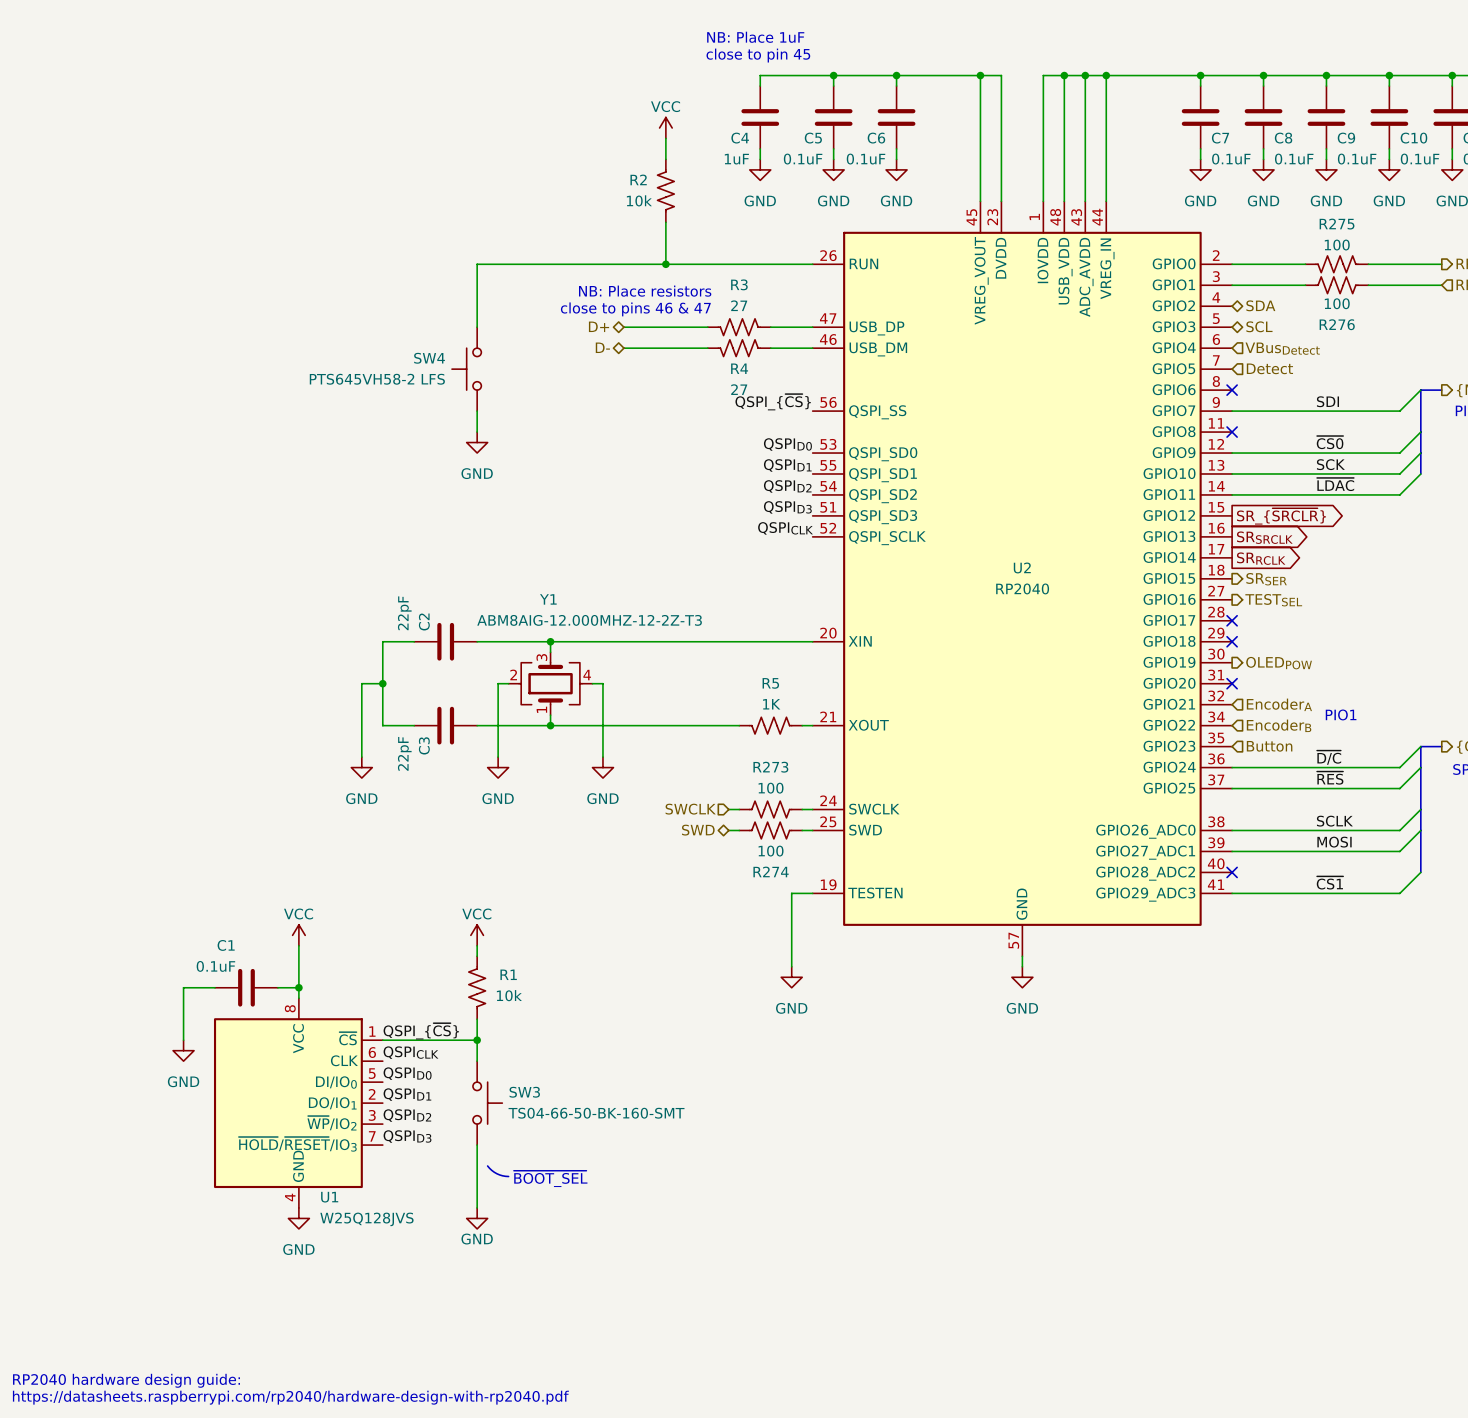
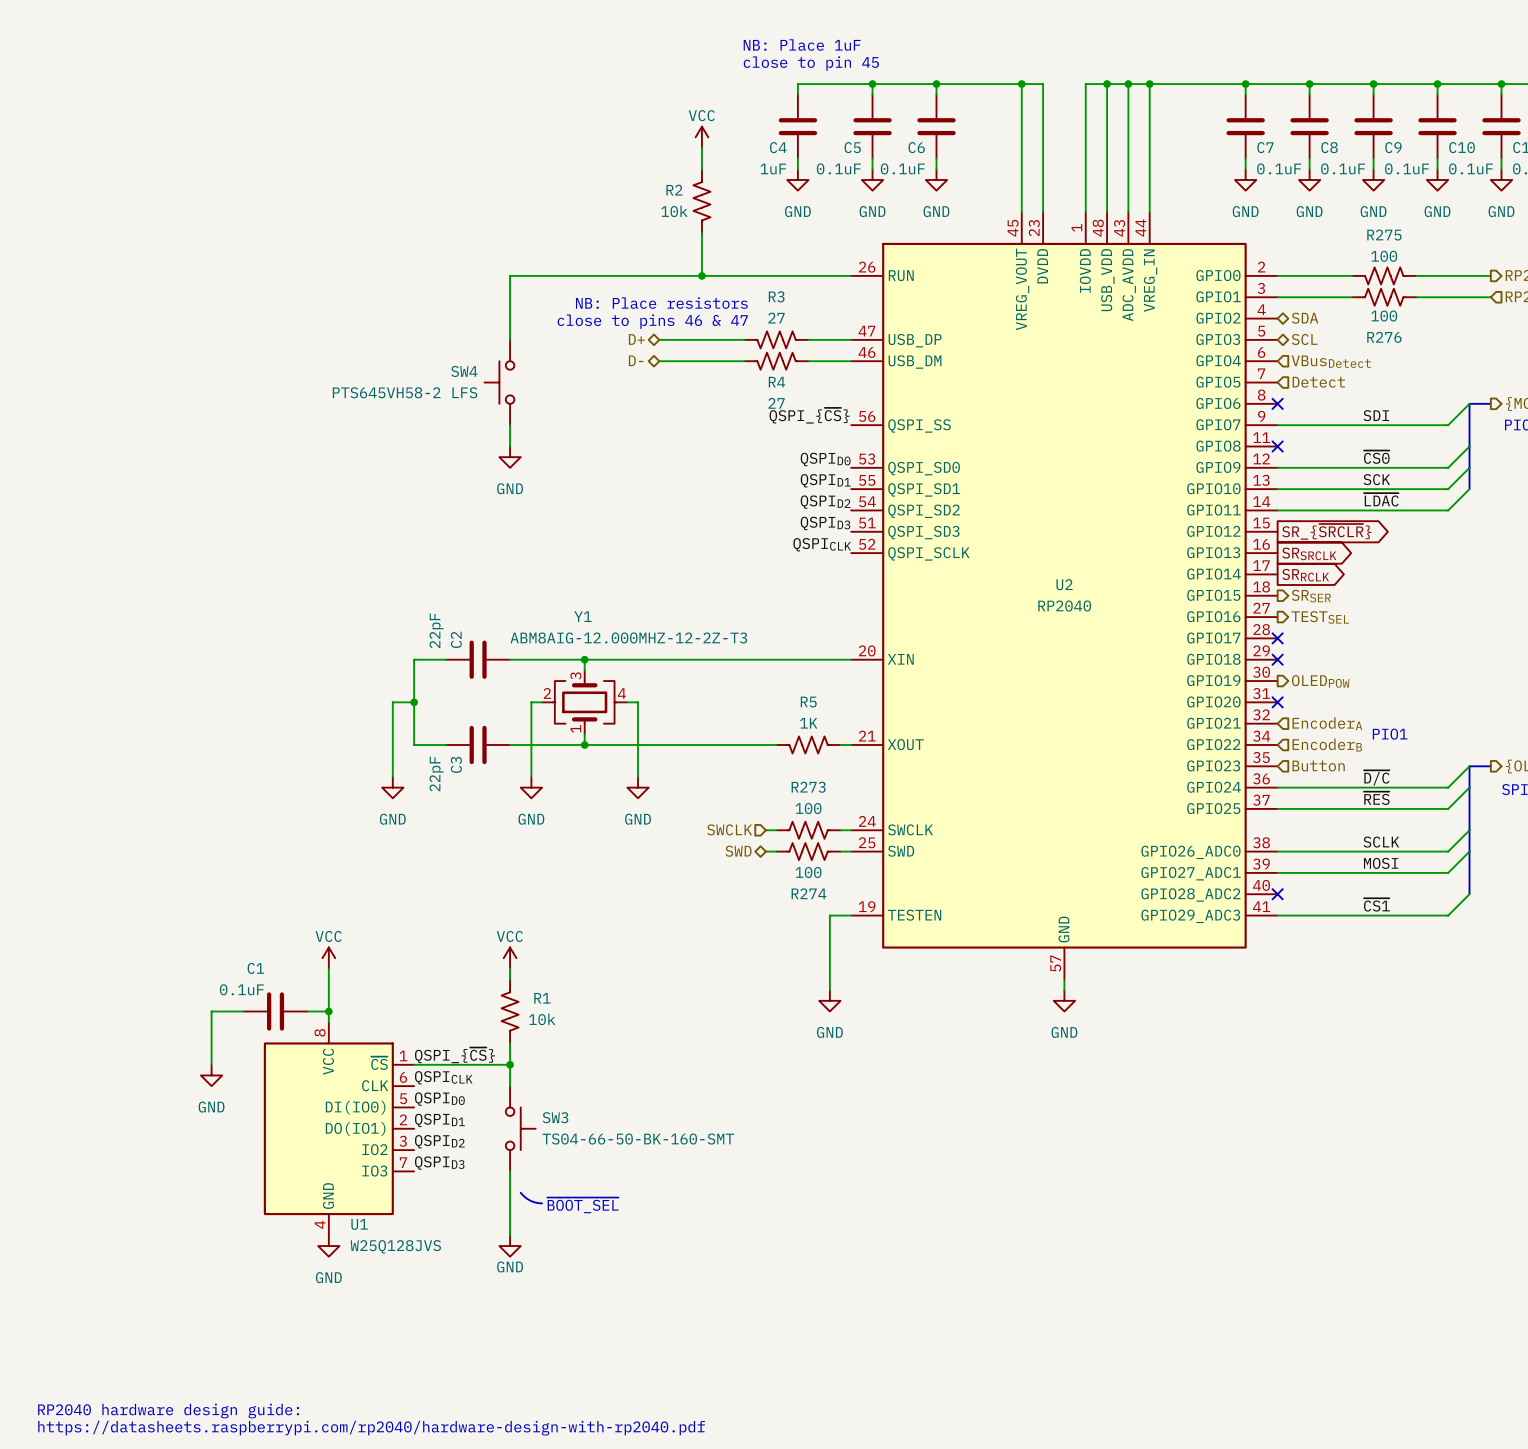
U1 symbol: [213, 998, 383, 1208] -> [263, 1022, 415, 1236]

